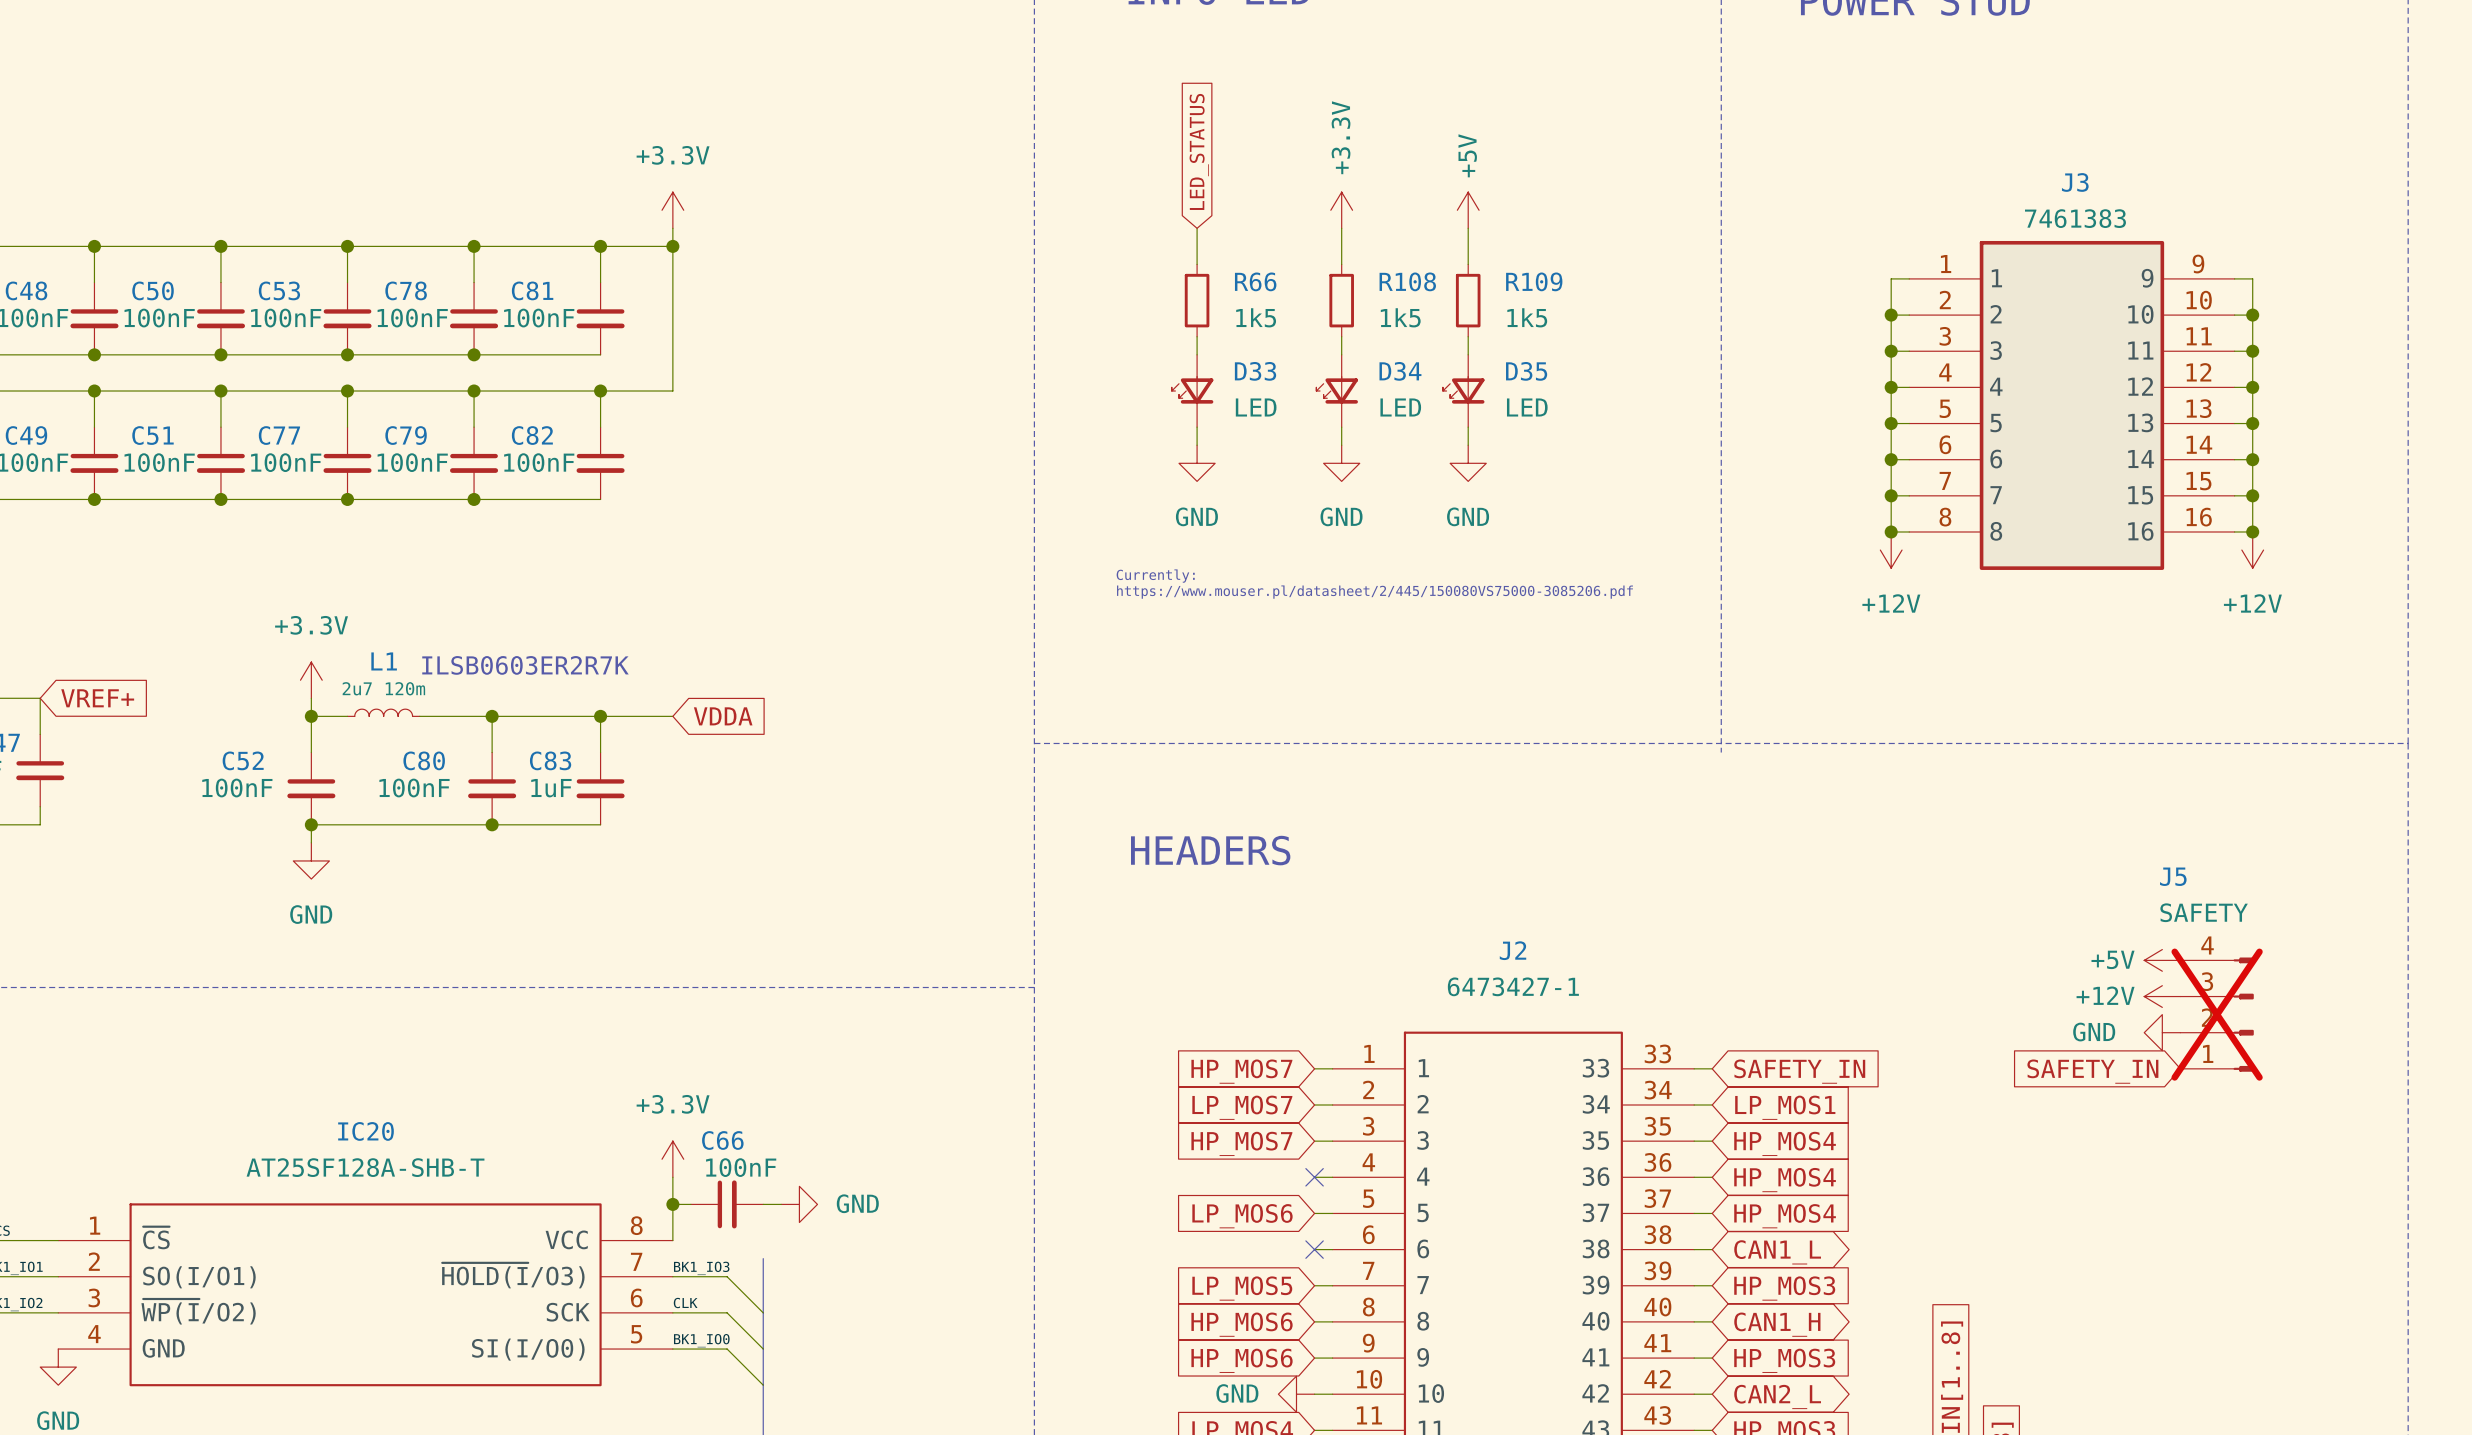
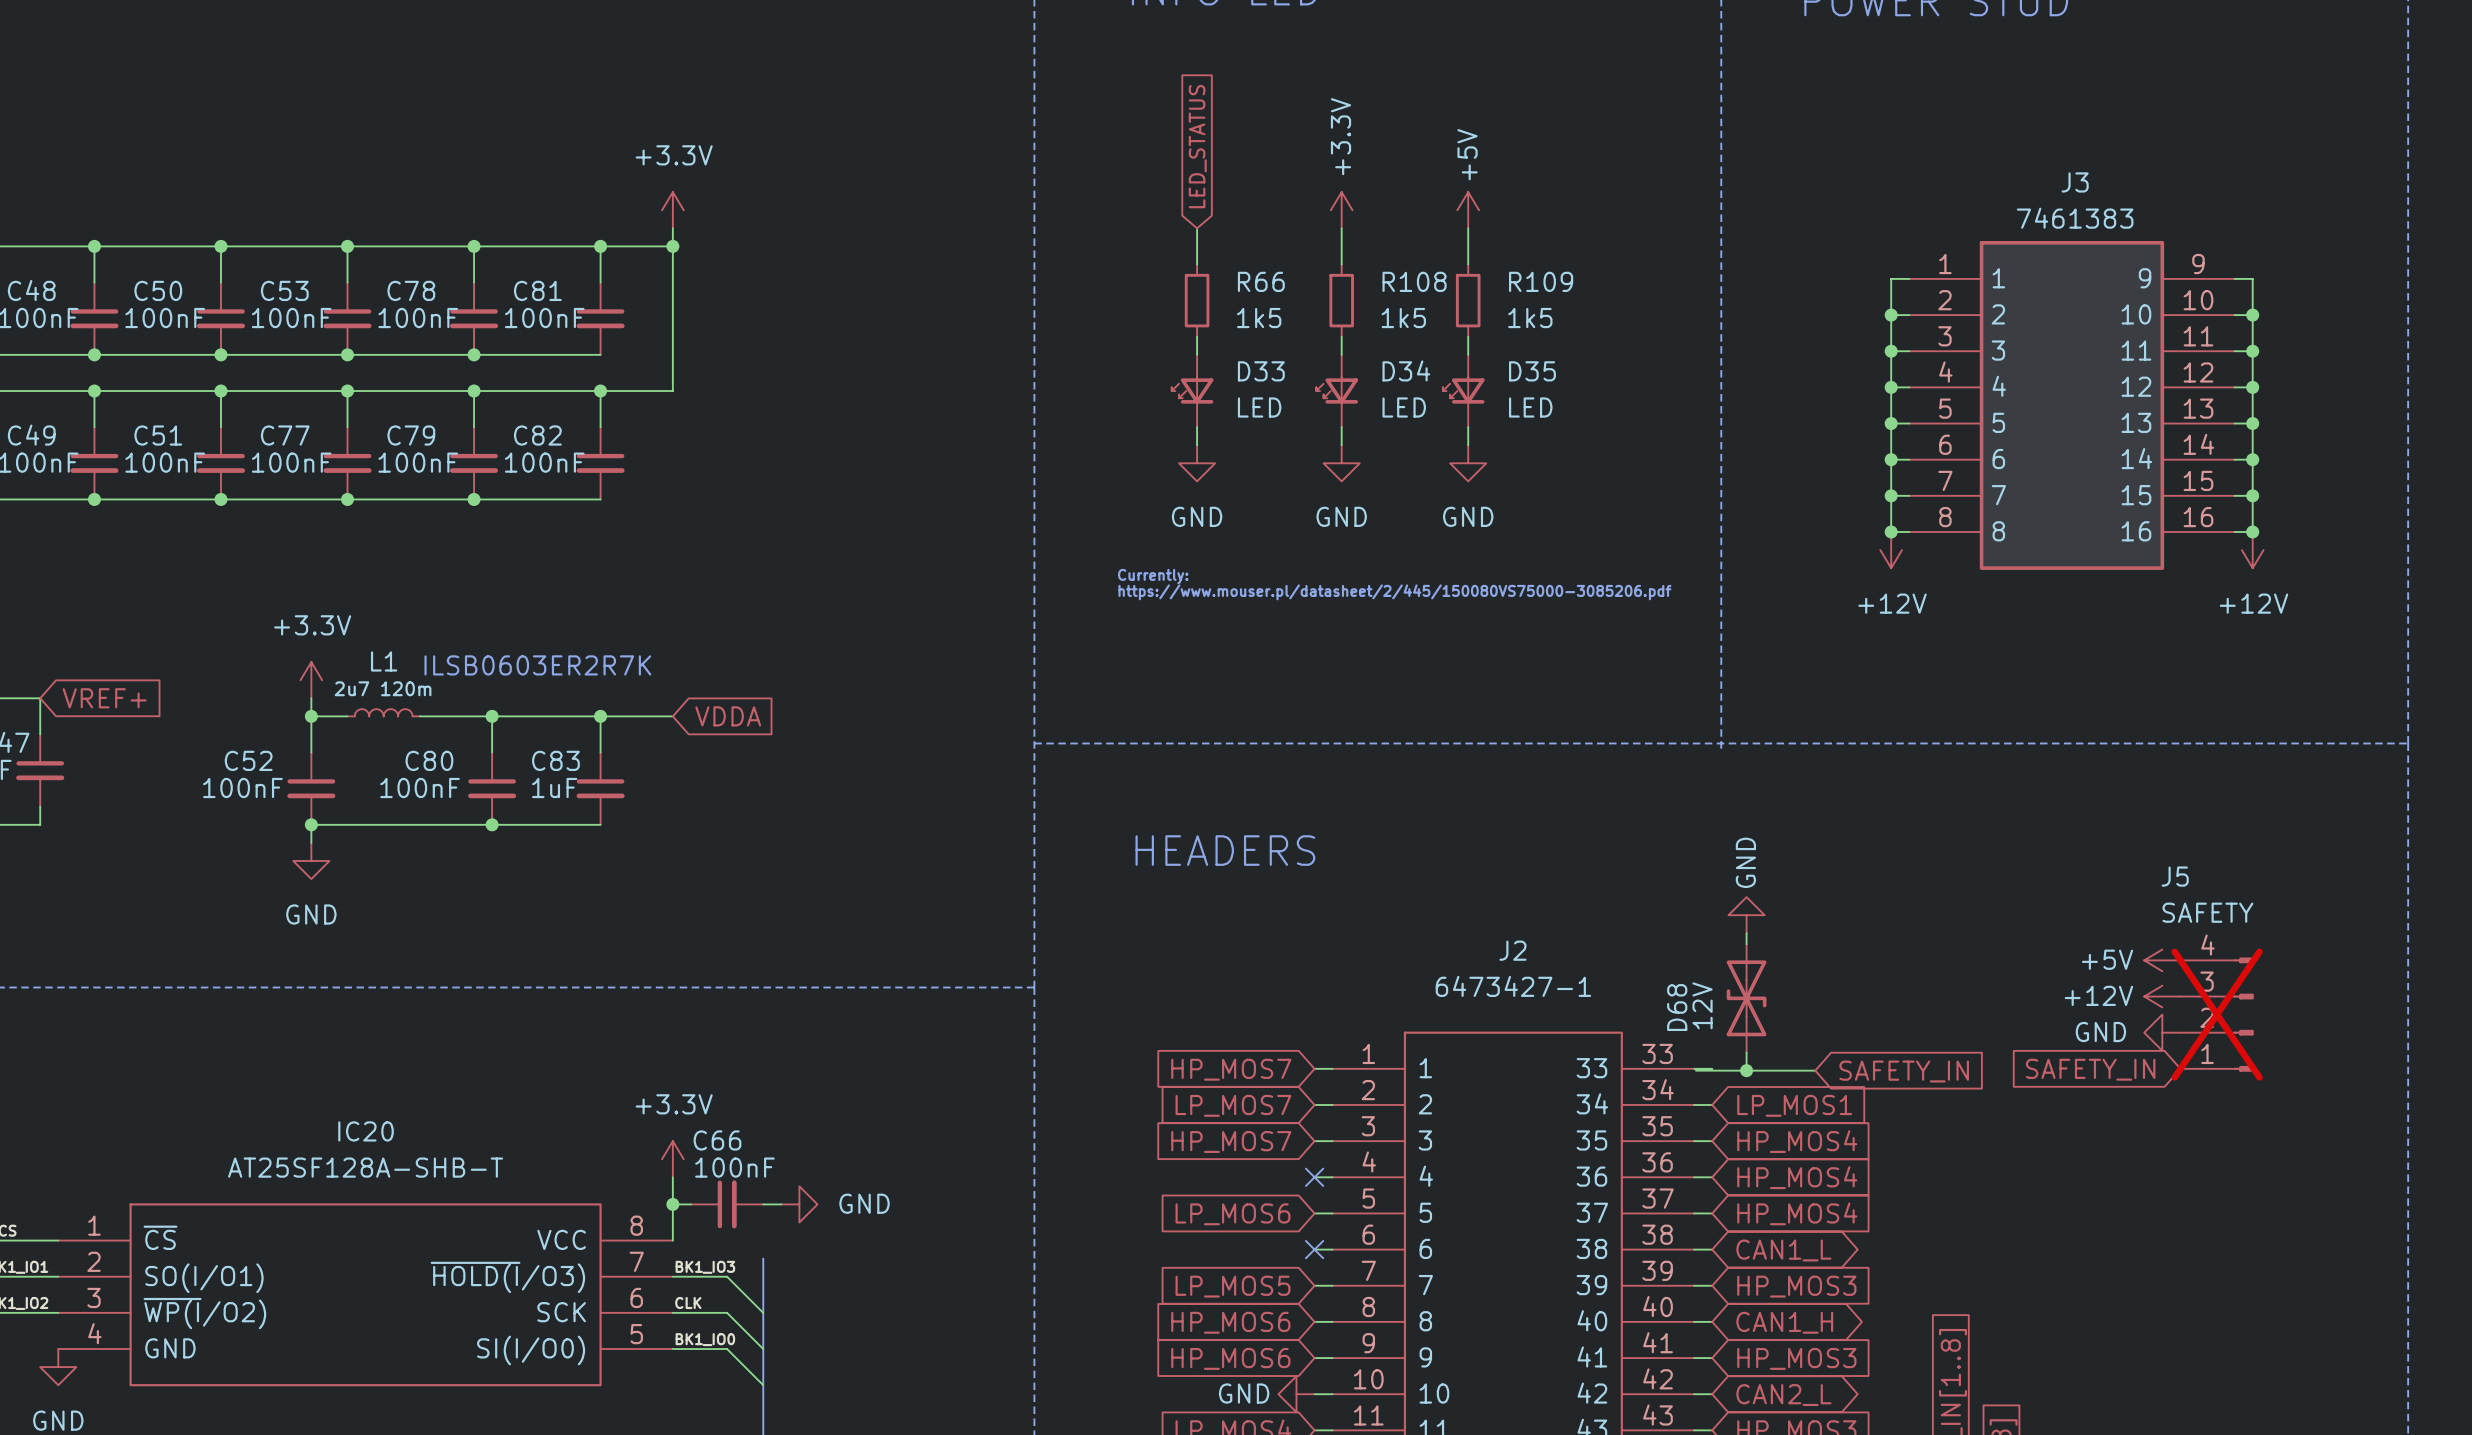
power symbol: none -> GND (1746, 915)
wire: none -> (1746, 933) (1746, 944)
D68: none -> 12V (1746, 998)
wire: none -> (1746, 1052) (1746, 1070)
wire: none -> (1695, 1070) (1815, 1070)
junction: none -> (1746, 1070)
global label position: SAFETY_IN (1799, 1071) -> SAFETY_IN (1904, 1071)

